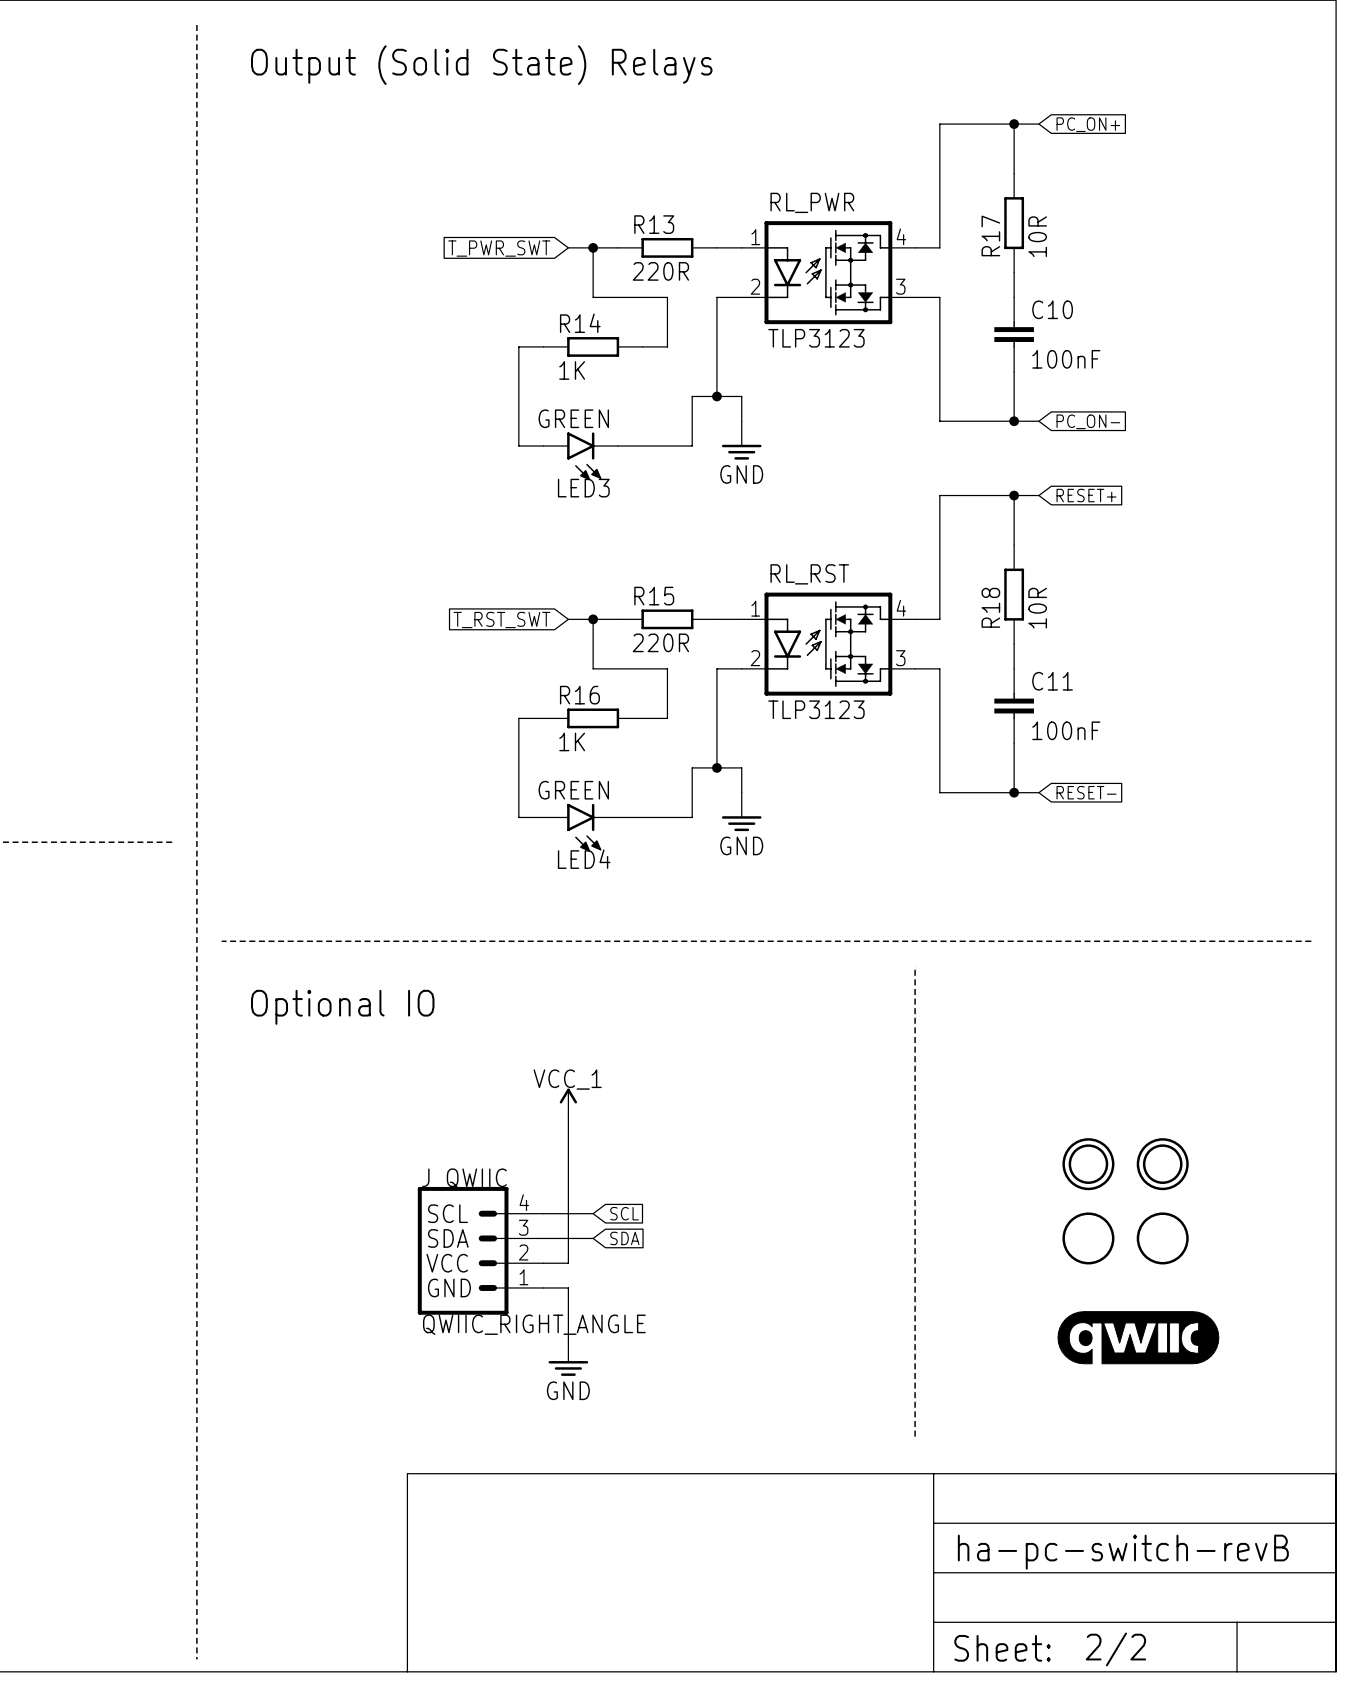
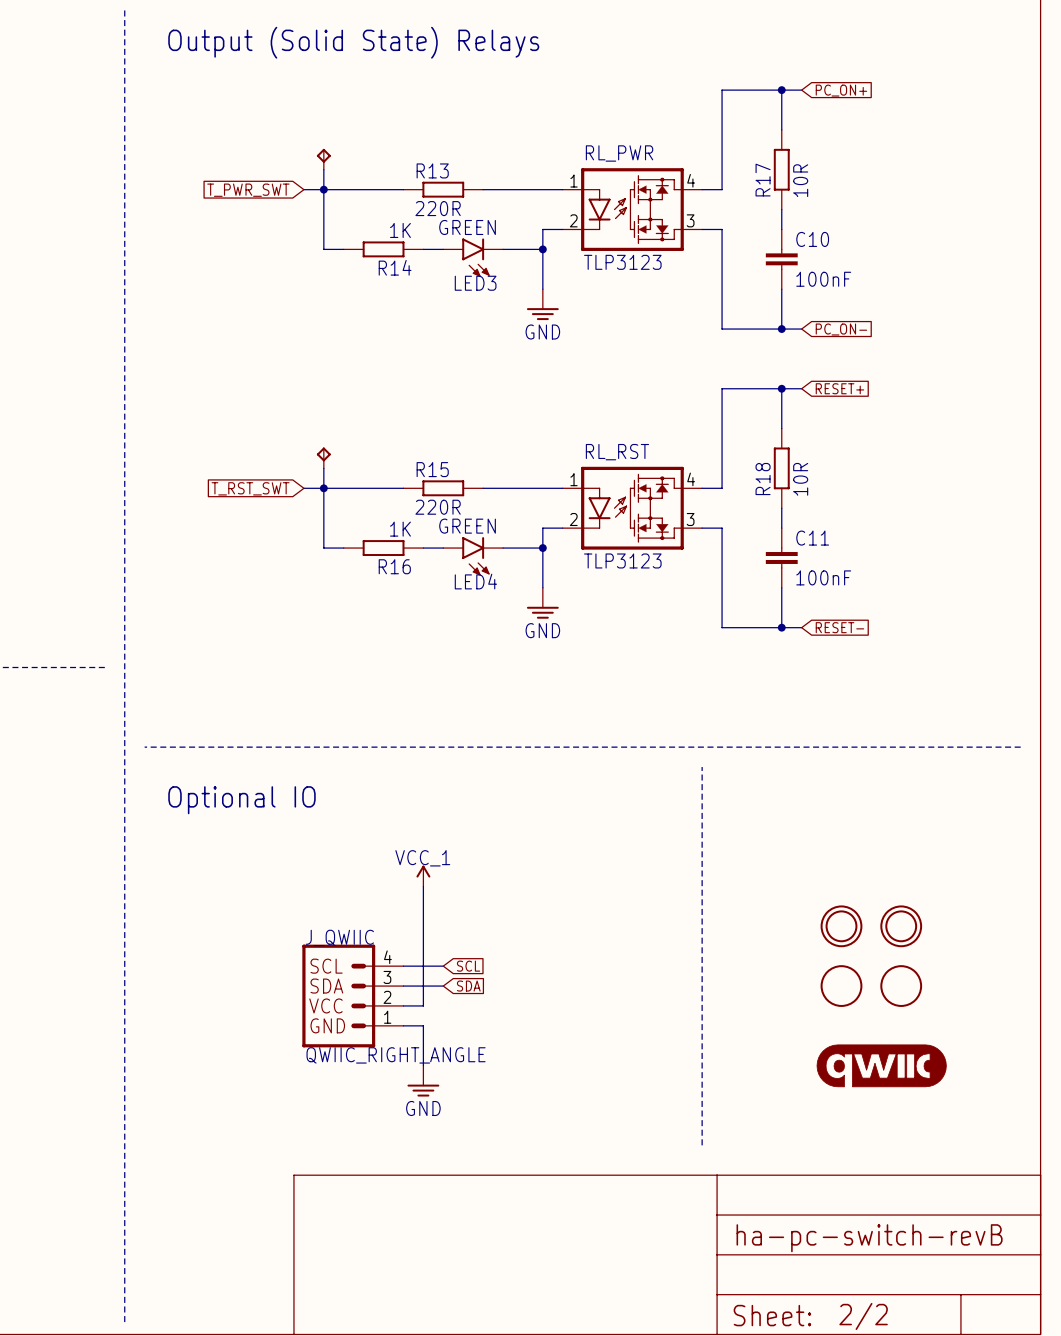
part: none -> (323, 159)
wire: none -> (323, 169) (323, 249) (343, 249)
wire: none -> (303, 189) (403, 189)
junction: none -> (323, 189)
wire: (568, 247) (617, 247) -> (503, 249) (542, 249)
wire: (593, 247) (593, 297) (667, 297) (667, 346) (642, 346) -> none
junction: (593, 247) -> none
wire: none -> (483, 189) (542, 189)
R13 position: (667, 247) -> (443, 189)
global label position: T_PWR_SWT (499, 248) -> T_PWR_SWT (248, 190)
wire: none -> (423, 249) (443, 249)
junction: none -> (542, 249)
R14 name position: R14 (580, 323) -> R14 (395, 267)
wire: (543, 346) (518, 346) (518, 446) (543, 446) -> none
R14 position: (593, 346) -> (383, 249)
R14 value position: 1K (572, 370) -> 1K (400, 230)
junction: (716, 396) -> none
wire: (741, 421) (741, 396) (692, 396) (692, 446) (617, 446) -> none
power symbol position: GND (741, 440) -> GND (542, 304)
LED3 position: (580, 456) -> (473, 257)
part: none -> (323, 457)
wire: none -> (323, 468) (323, 548) (343, 548)
wire: none -> (303, 488) (403, 488)
junction: none -> (323, 488)
wire: (568, 619) (617, 619) -> (503, 548) (542, 548)
wire: (593, 619) (593, 668) (667, 668) (667, 718) (642, 718) -> none
junction: (593, 619) -> none
wire: none -> (483, 488) (542, 488)
R15 position: (667, 619) -> (443, 488)
global label position: T_RST_SWT (501, 620) -> T_RST_SWT (250, 488)
wire: none -> (423, 548) (443, 548)
junction: none -> (542, 548)
R16 name position: R16 (579, 695) -> R16 (394, 566)
wire: (543, 718) (518, 718) (518, 817) (543, 817) -> none
R16 position: (593, 718) -> (383, 548)
R16 value position: 1K (572, 741) -> 1K (400, 529)
junction: (716, 767) -> none
wire: (741, 792) (741, 767) (692, 767) (692, 817) (617, 817) -> none
power symbol position: GND (741, 811) -> GND (542, 603)
LED4 position: (580, 827) -> (473, 556)

